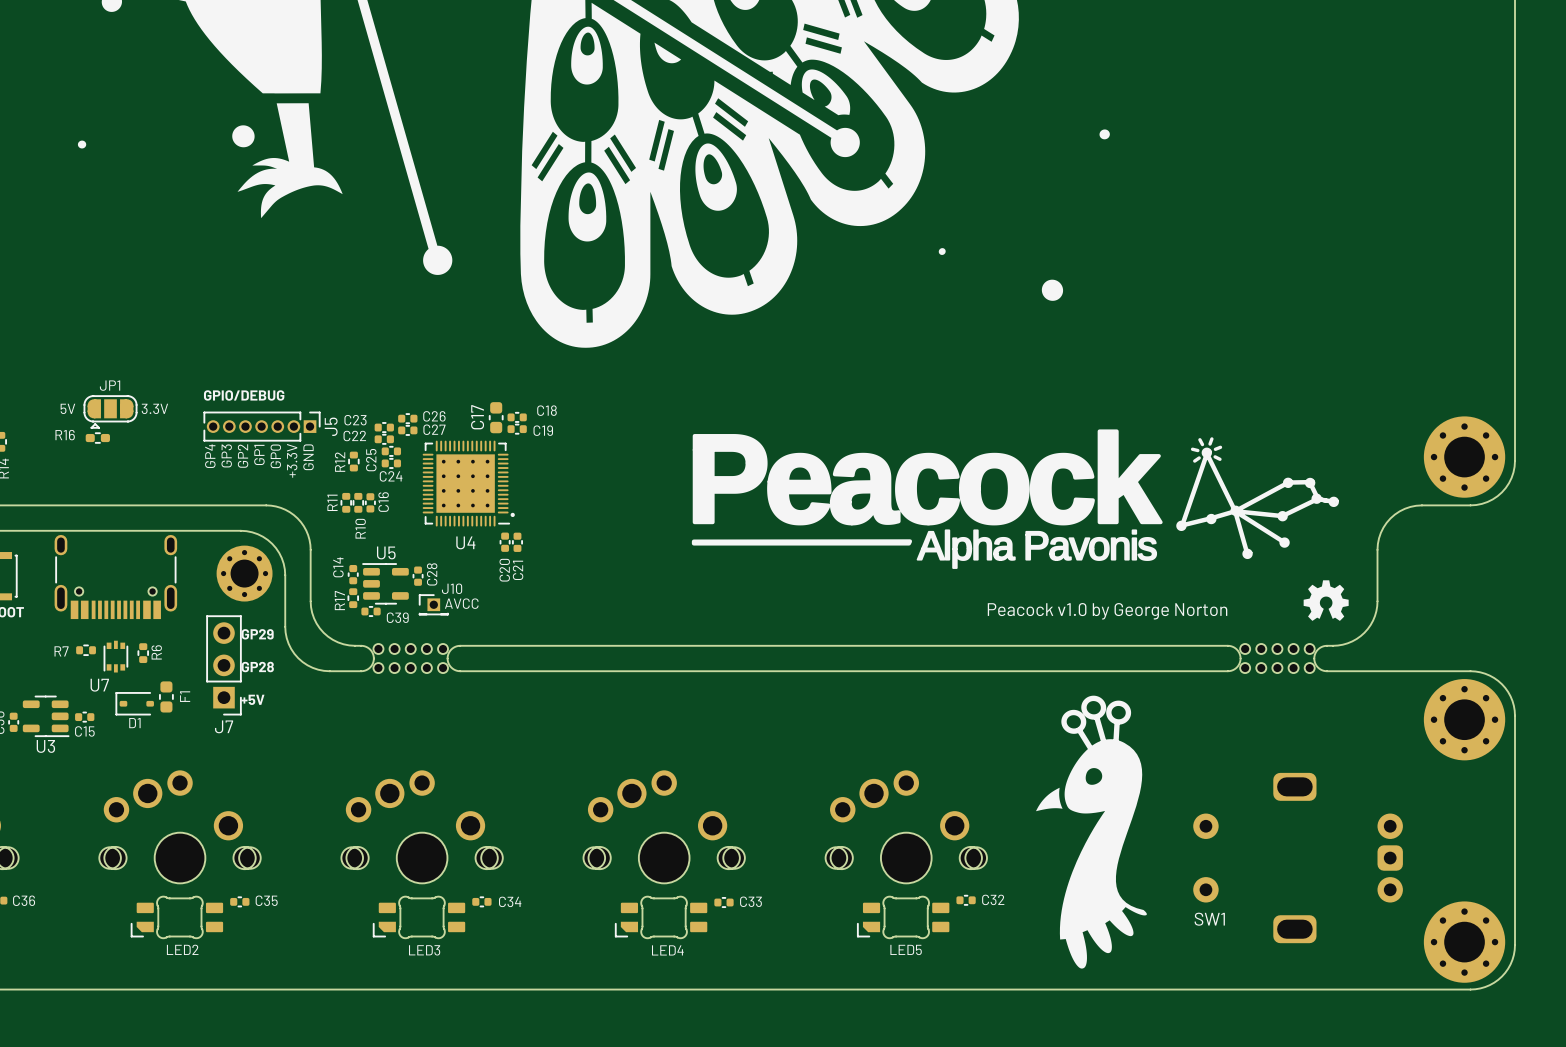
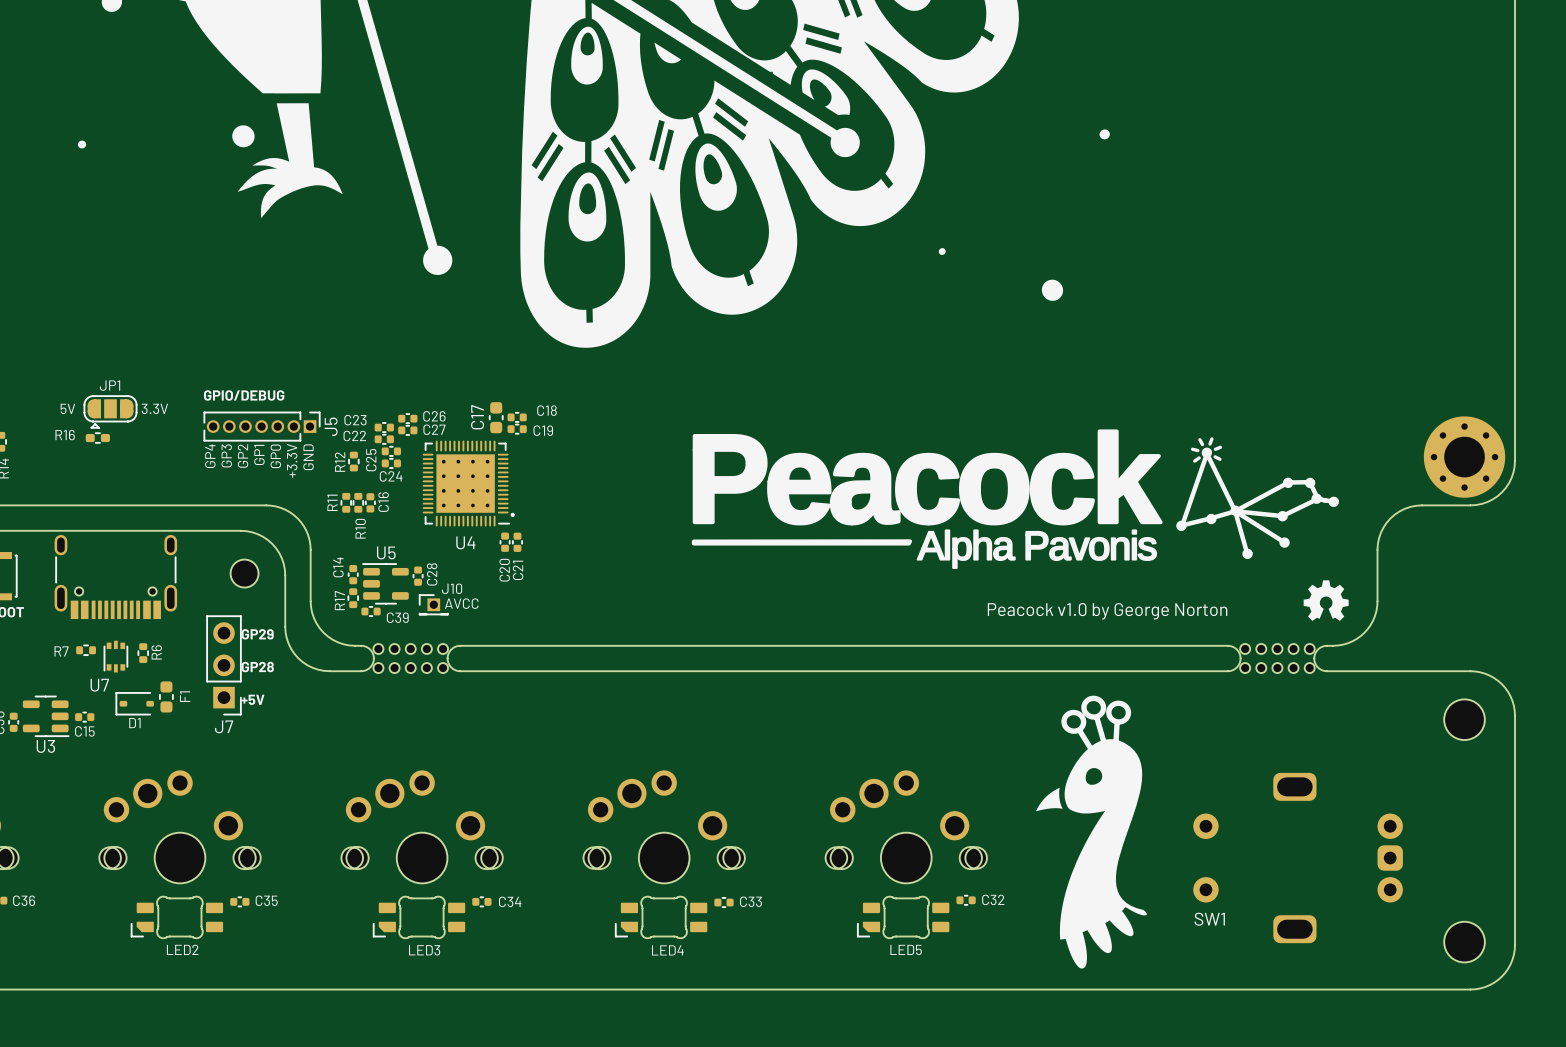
part footprint: [216, 545, 273, 602] -> [230, 559, 259, 588]
part footprint: [1423, 679, 1506, 761] -> [1444, 699, 1485, 741]
part footprint: [1423, 901, 1506, 983] -> [1444, 921, 1485, 963]

